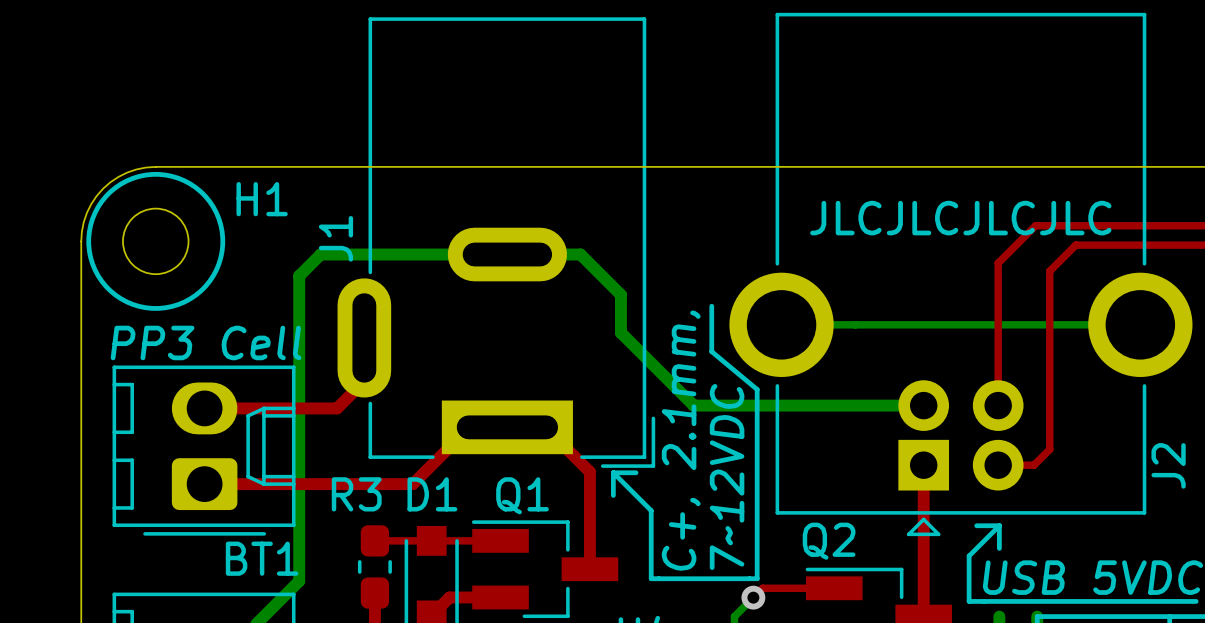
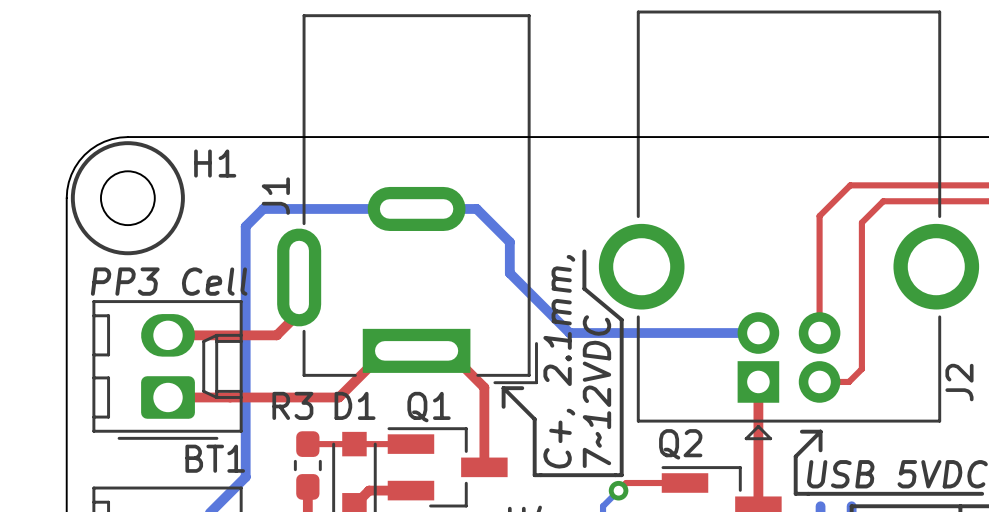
text: JLCJLCJLCJLC (960, 218) -> none
bottom track: (781, 324) (1140, 324) -> none

